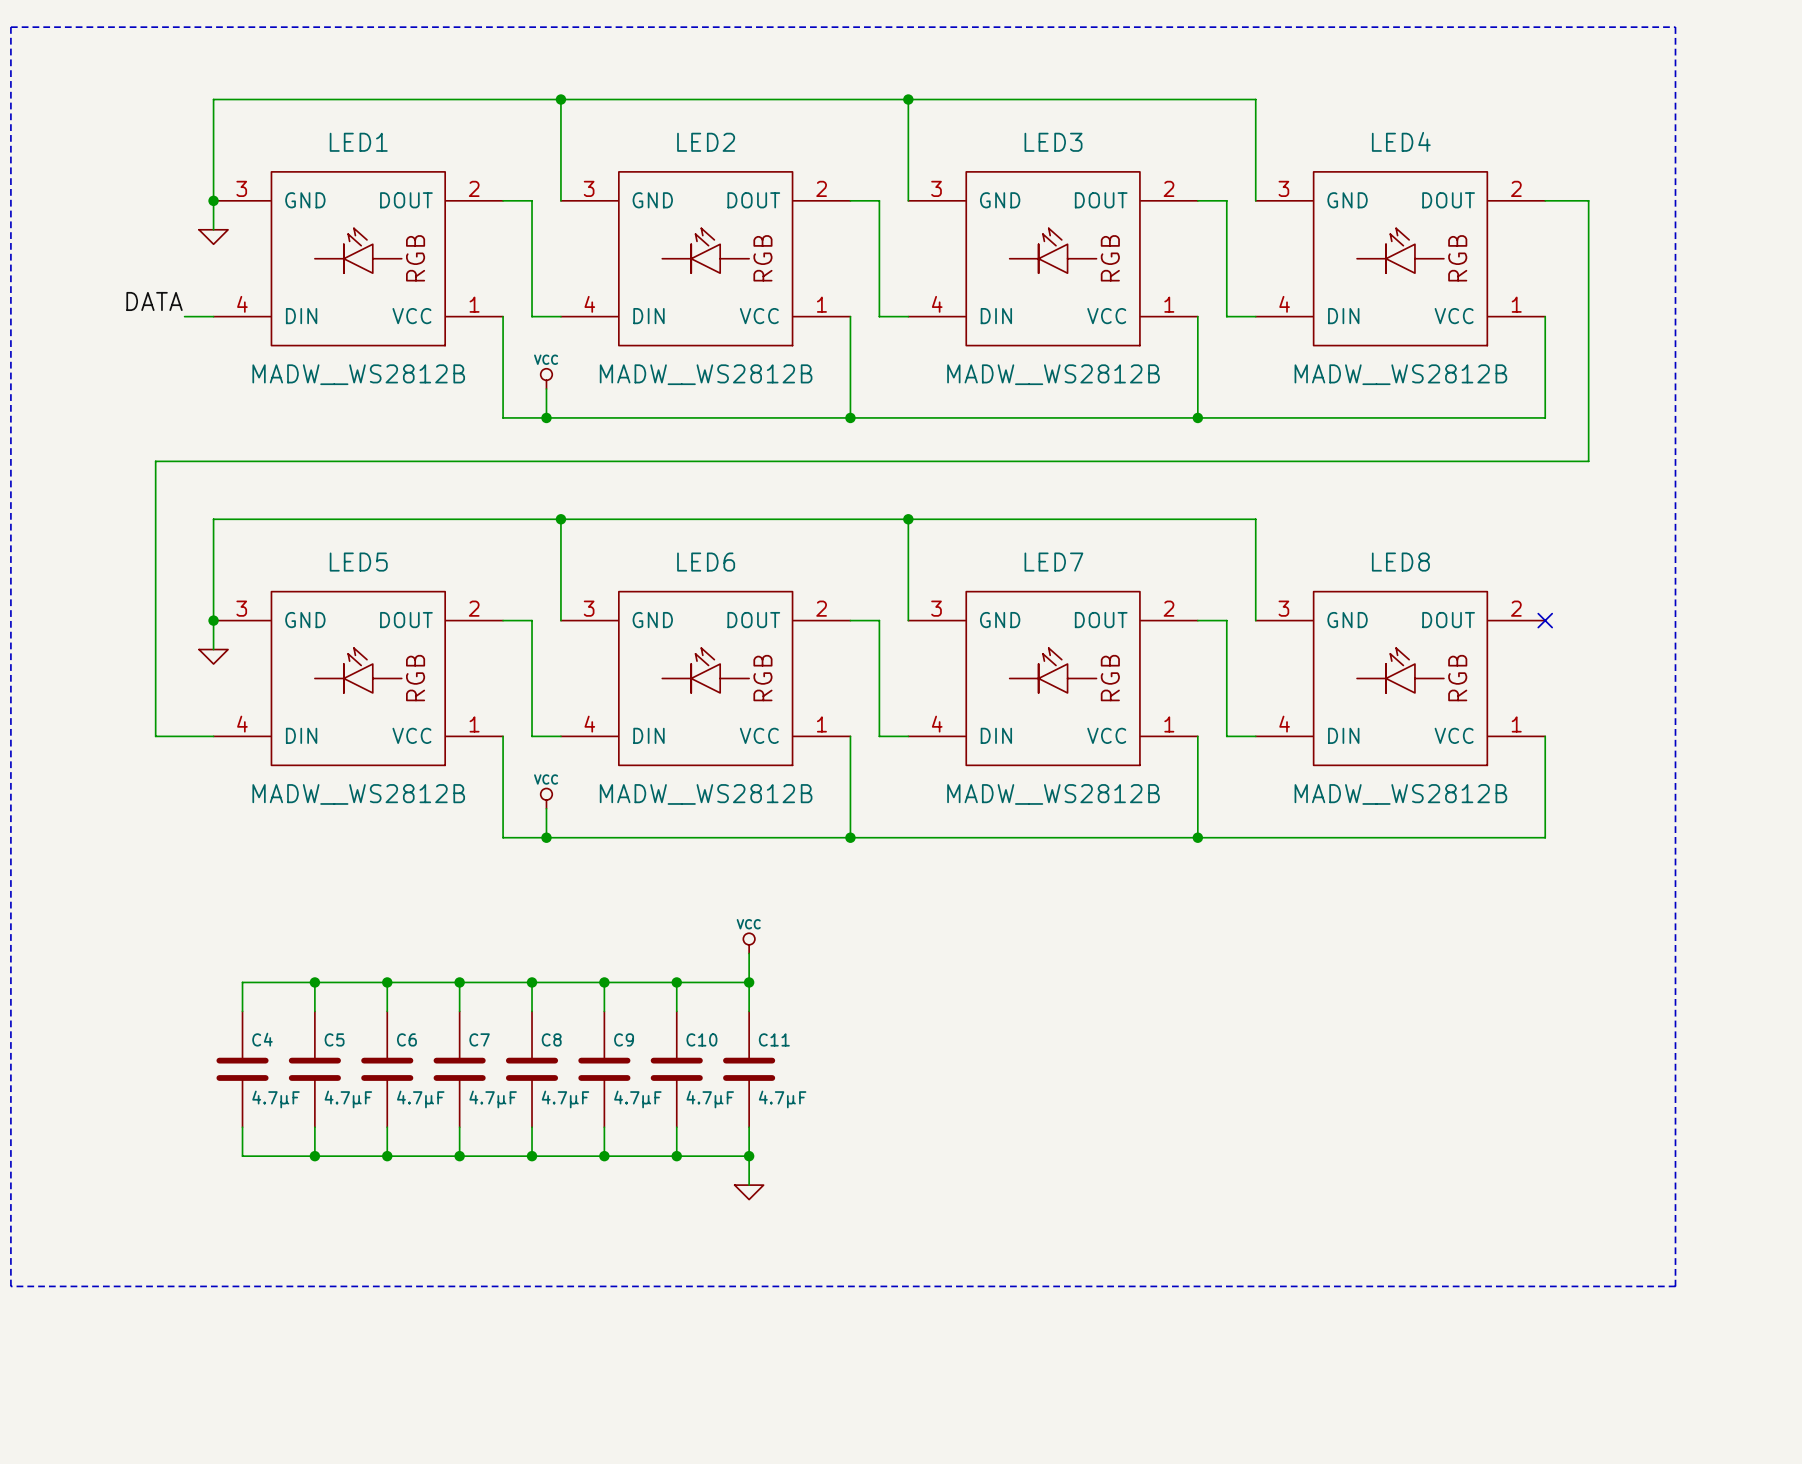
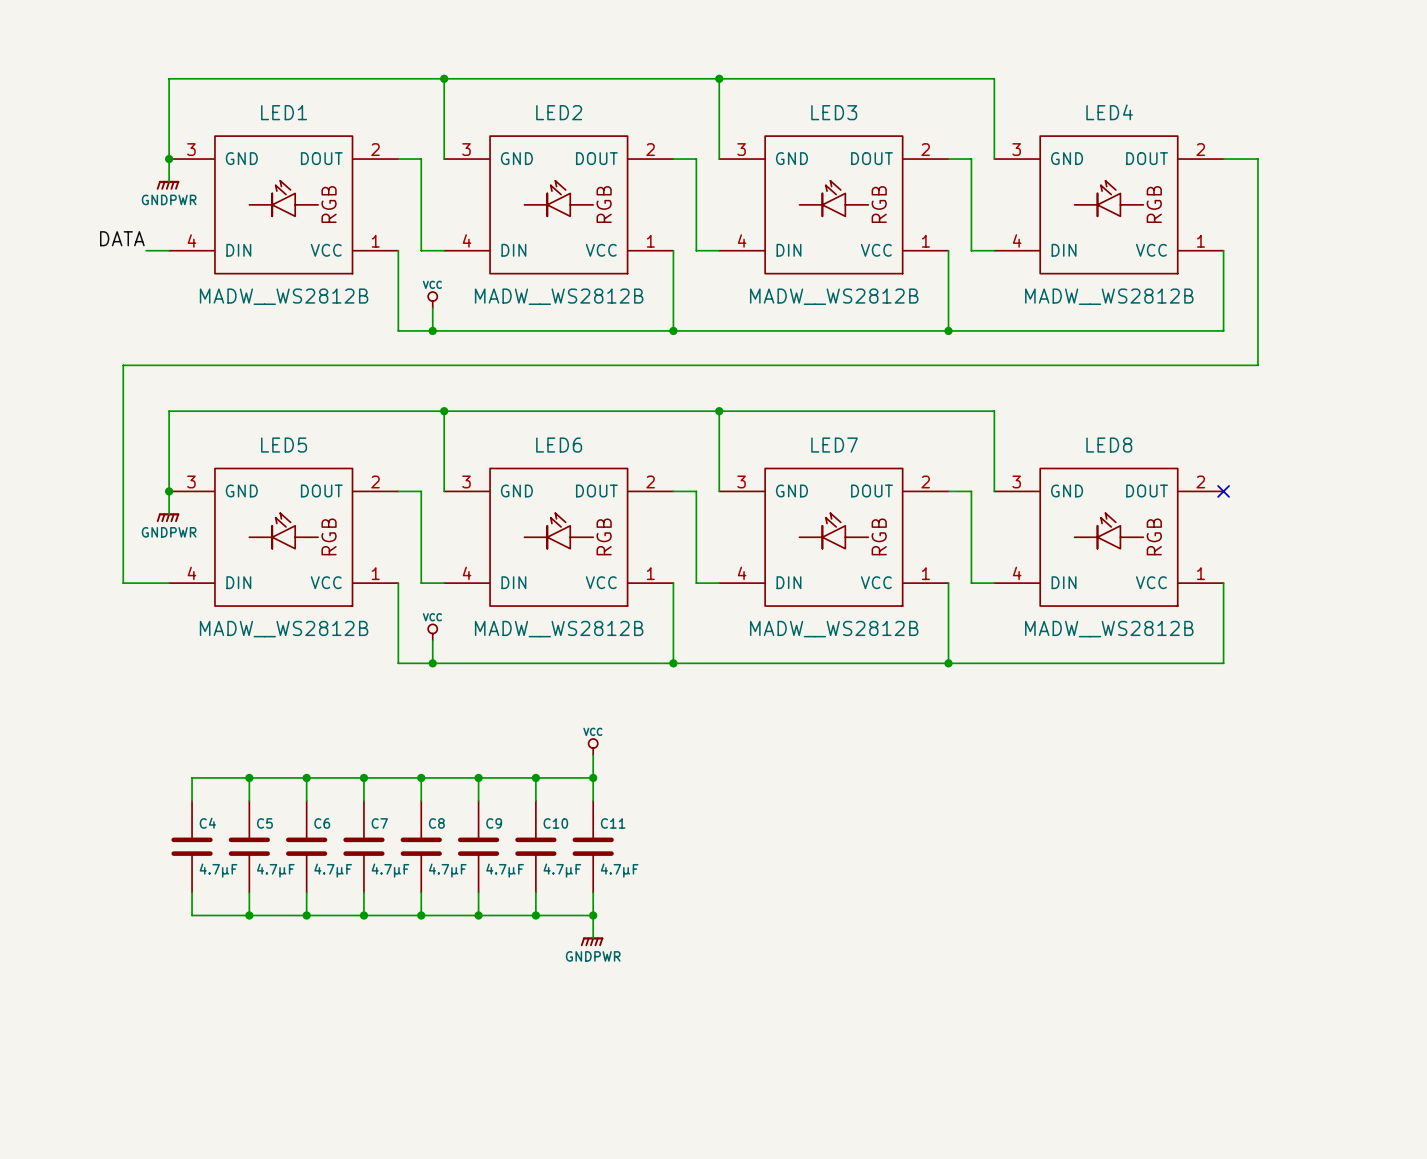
line: (10, 27) (1675, 27) (1675, 1286) (10, 1286) (10, 27) -> none
power symbol shape: [199, 229, 229, 245] -> [156, 180, 180, 190]
power symbol text: none -> GNDPWR (169, 199)
power symbol shape: [199, 649, 229, 665] -> [156, 513, 180, 523]
power symbol text: none -> GNDPWR (169, 532)
power symbol shape: [734, 1185, 764, 1200] -> [580, 937, 604, 947]
power symbol text: none -> GNDPWR (593, 956)

